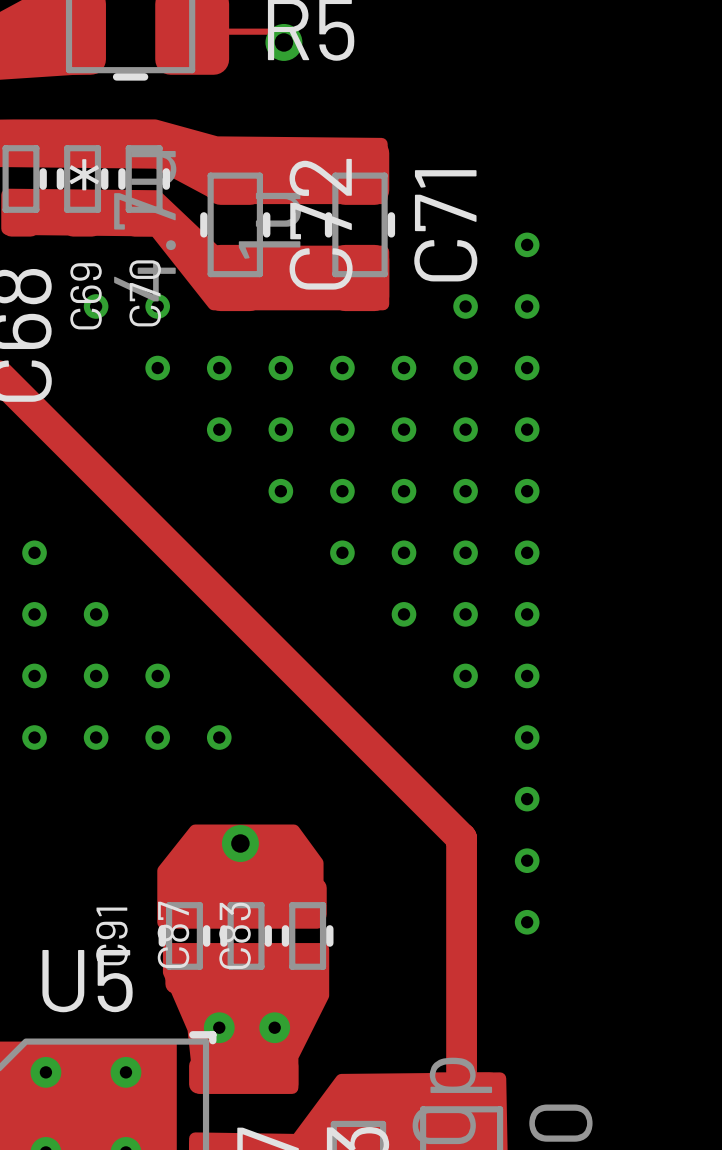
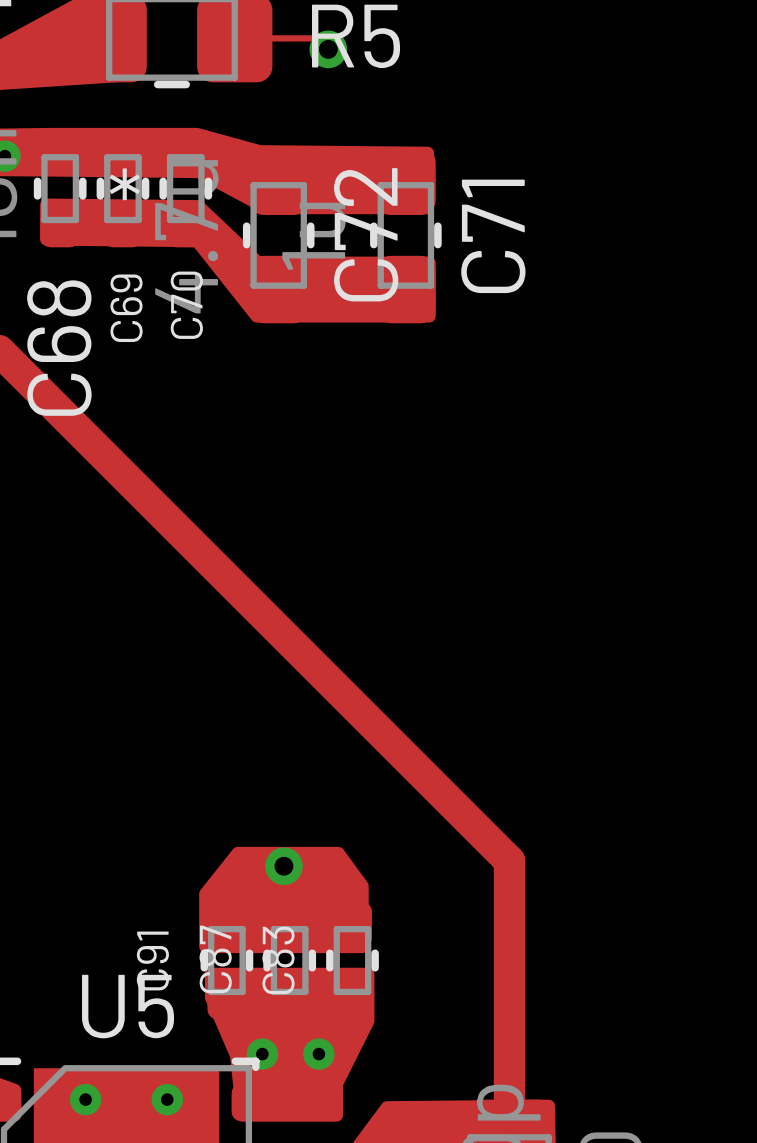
via: (527, 244) -> none
via: (96, 306) -> none
via: (157, 306) -> none
via: (465, 306) -> none
via: (527, 306) -> none
via: (157, 368) -> none
via: (219, 368) -> none
via: (280, 368) -> none
via: (342, 368) -> none
via: (404, 368) -> none
via: (465, 368) -> none
via: (527, 368) -> none
via: (219, 429) -> none
via: (280, 429) -> none
via: (342, 429) -> none
via: (404, 429) -> none
via: (465, 429) -> none
via: (527, 429) -> none
via: (280, 491) -> none
via: (342, 491) -> none
via: (404, 491) -> none
via: (465, 491) -> none
via: (527, 491) -> none
via: (34, 552) -> none
via: (342, 552) -> none
via: (404, 552) -> none
via: (465, 552) -> none
via: (527, 552) -> none
via: (34, 614) -> none
via: (96, 614) -> none
via: (404, 614) -> none
via: (465, 614) -> none
via: (527, 614) -> none
via: (34, 675) -> none
via: (96, 675) -> none
via: (157, 675) -> none
via: (465, 675) -> none
via: (527, 675) -> none
via: (34, 737) -> none
via: (96, 737) -> none
via: (157, 737) -> none
via: (219, 737) -> none
via: (527, 737) -> none
via: (527, 799) -> none
via: (527, 860) -> none
via: (527, 922) -> none

